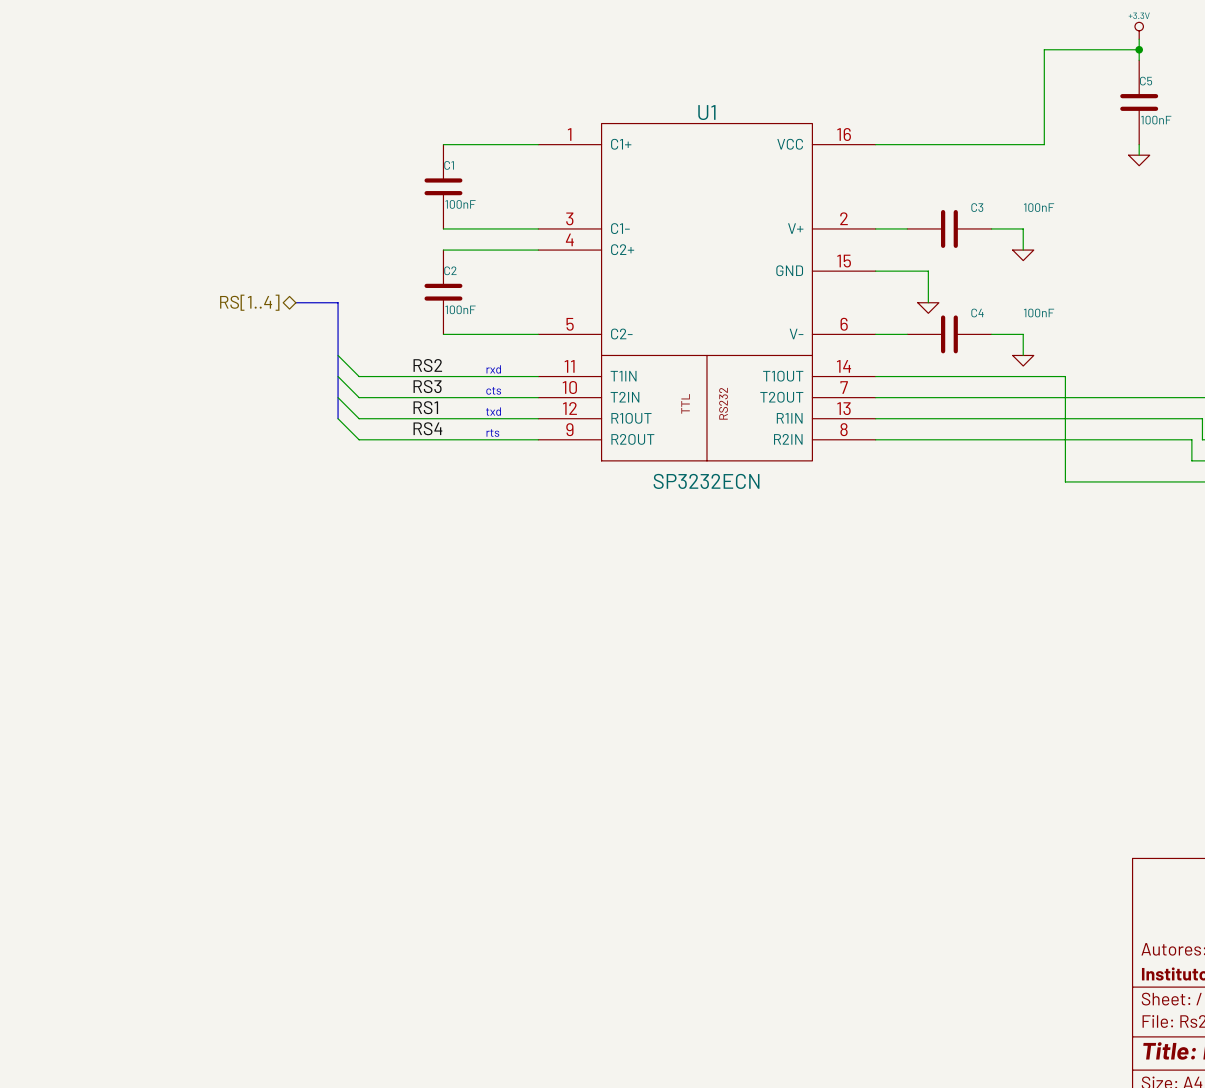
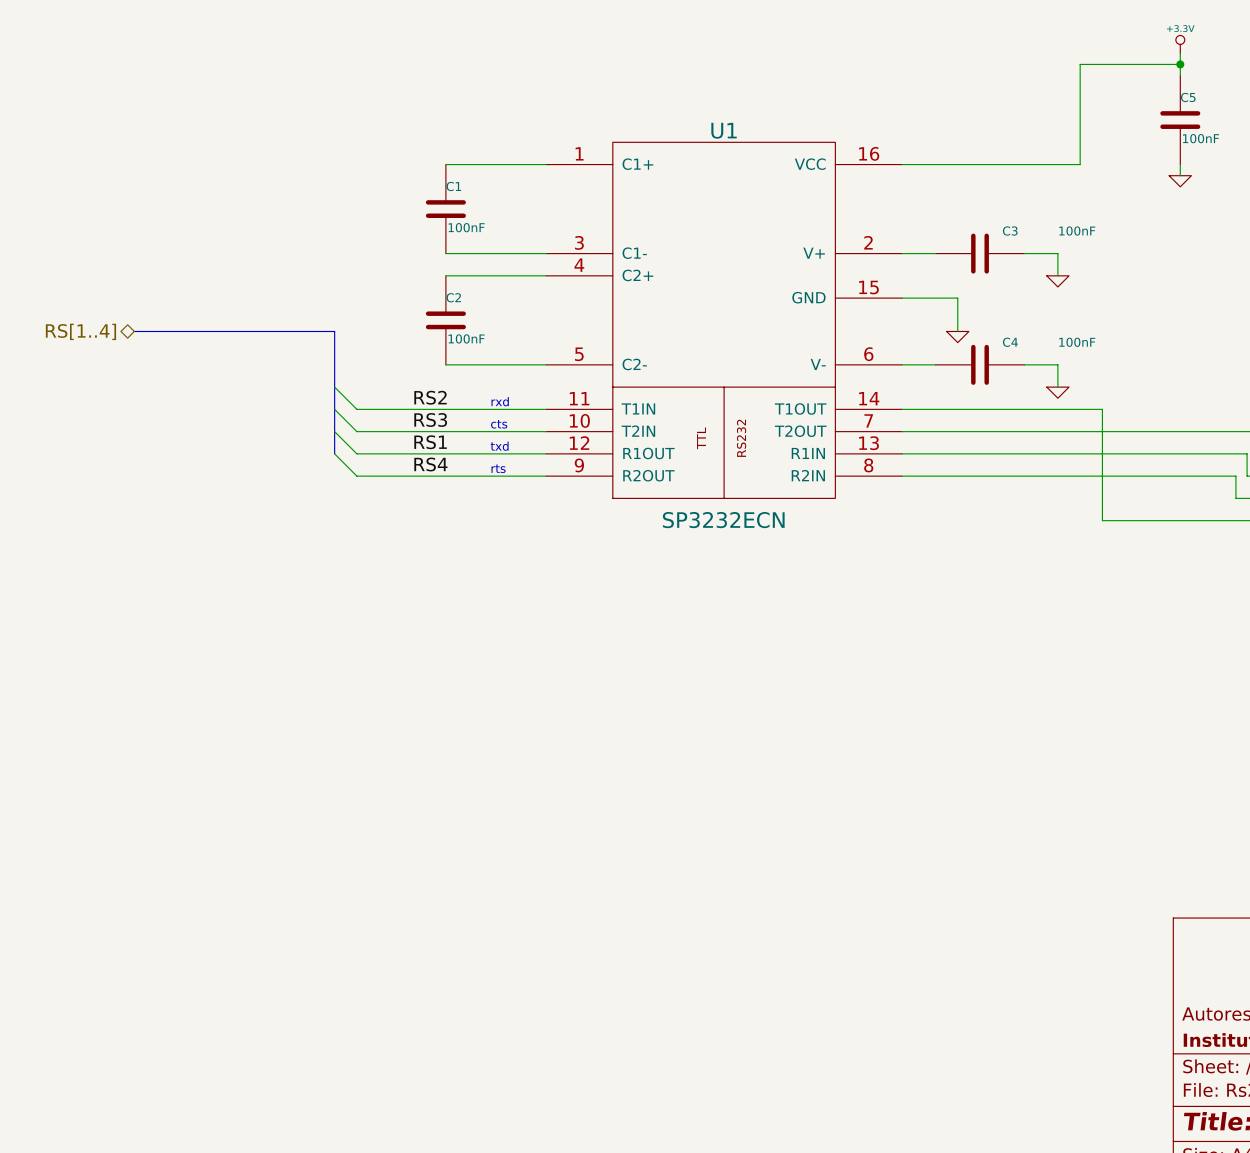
bus: none -> (134, 331) (290, 331)
hierarchical label position: RS[1..4] (249, 302) -> RS[1..4] (80, 331)

